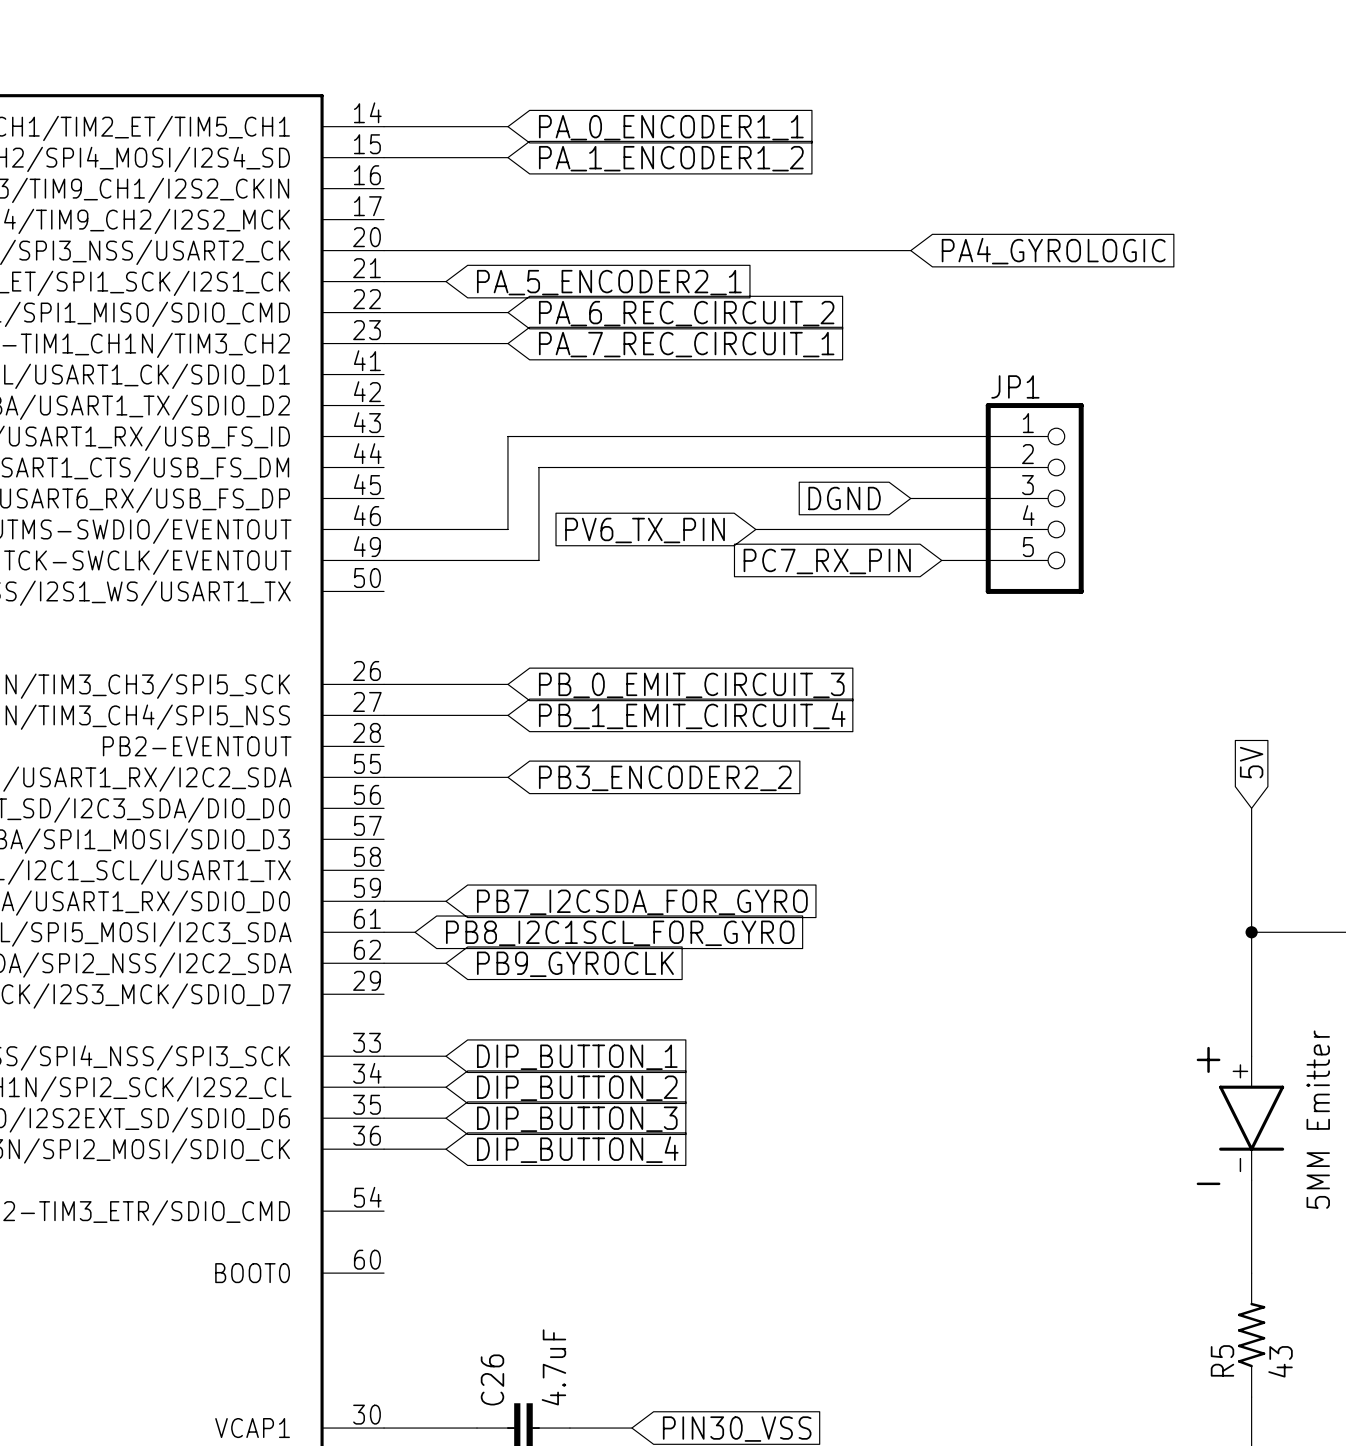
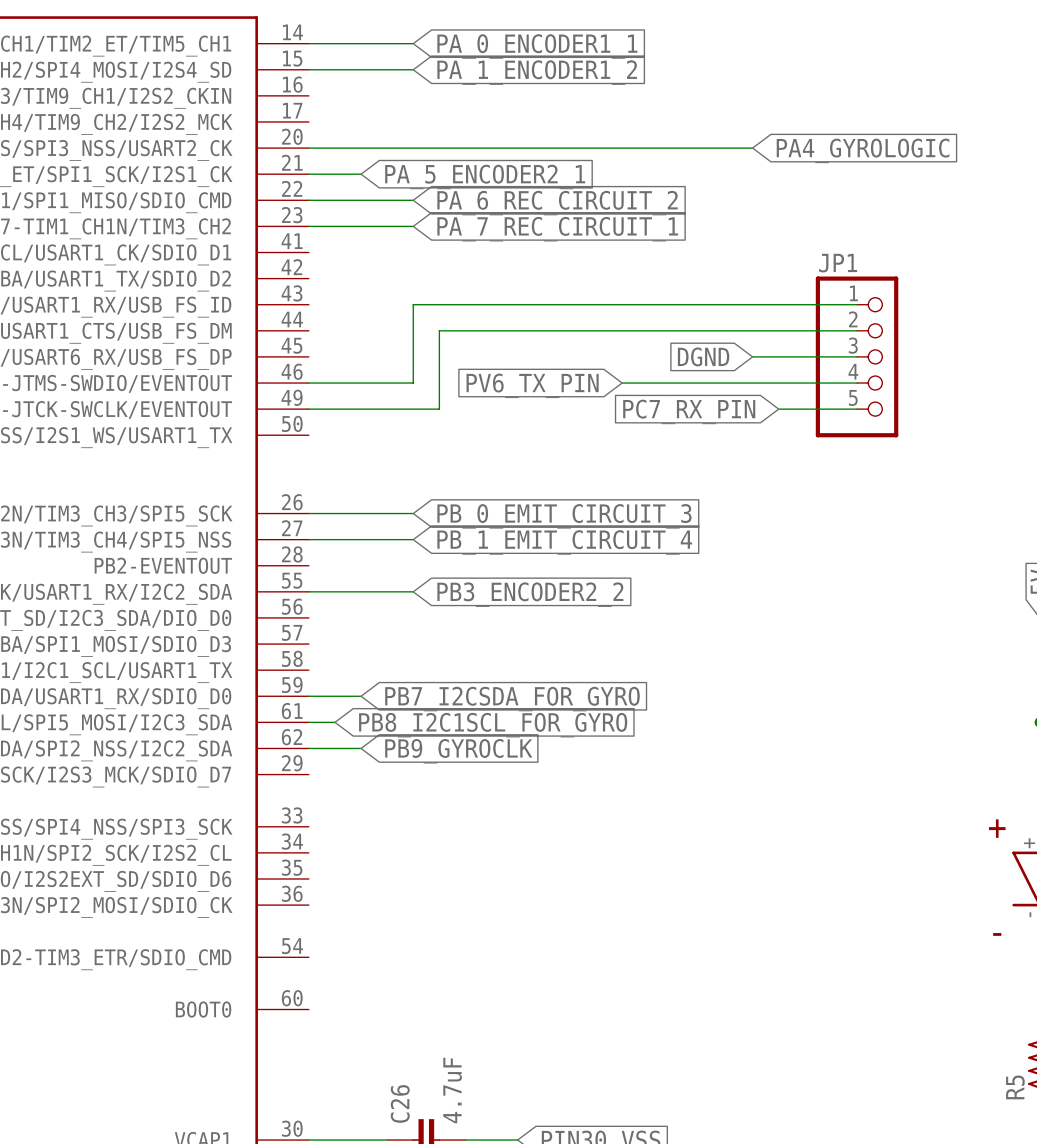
wire: (384, 1056) (446, 1056) -> none
global label: DIP_BUTTON_1 (577, 1057) -> none
wire: (384, 1087) (446, 1087) -> none
global label: DIP_BUTTON_2 (577, 1088) -> none
wire: (384, 1118) (446, 1118) -> none
global label: DIP_BUTTON_3 (577, 1119) -> none
wire: (384, 1149) (446, 1149) -> none
global label: DIP_BUTTON_4 (577, 1149) -> none

